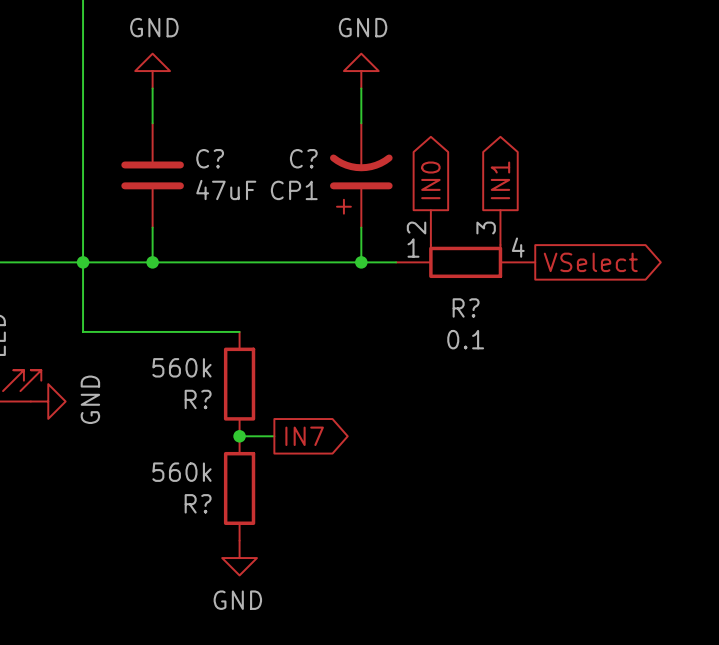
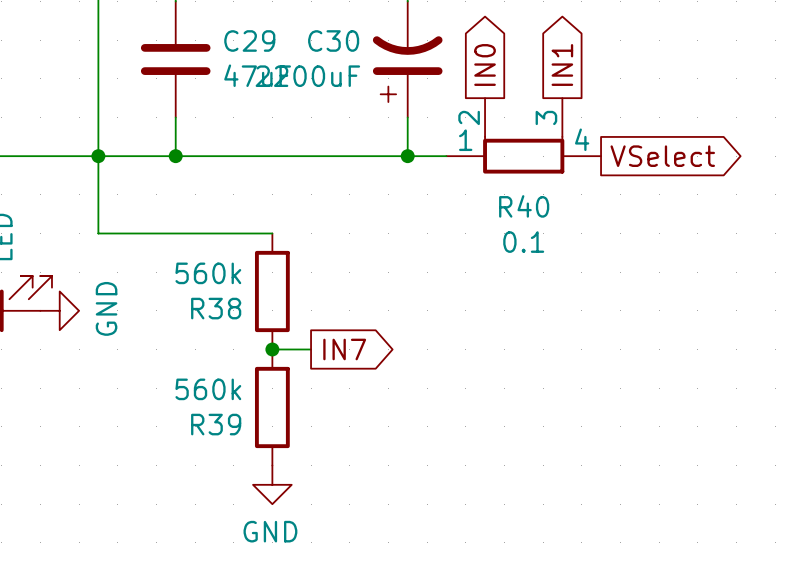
C? name: C? (210, 158) -> C29 (249, 40)
C? name: C? (303, 158) -> C30 (333, 40)
C? value: CP1 (294, 190) -> 2200uF (307, 76)
R? name: R? (466, 307) -> R40 (524, 206)
R? name: R? (198, 399) -> R38 (216, 308)
R? name: R? (198, 503) -> R39 (216, 424)

